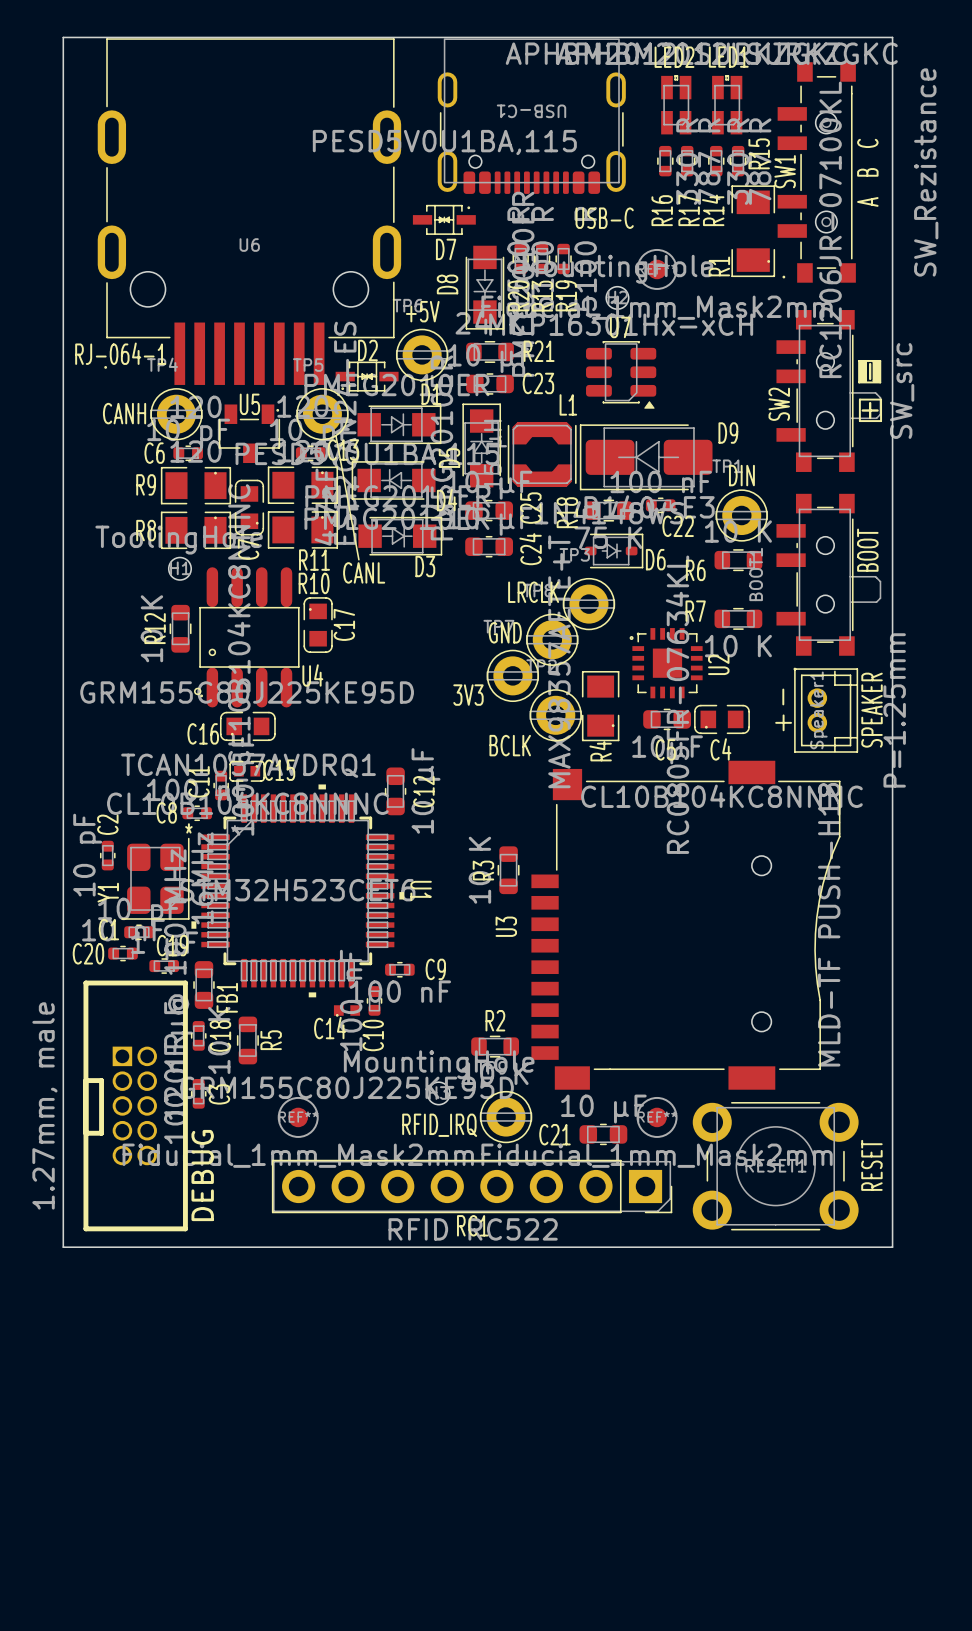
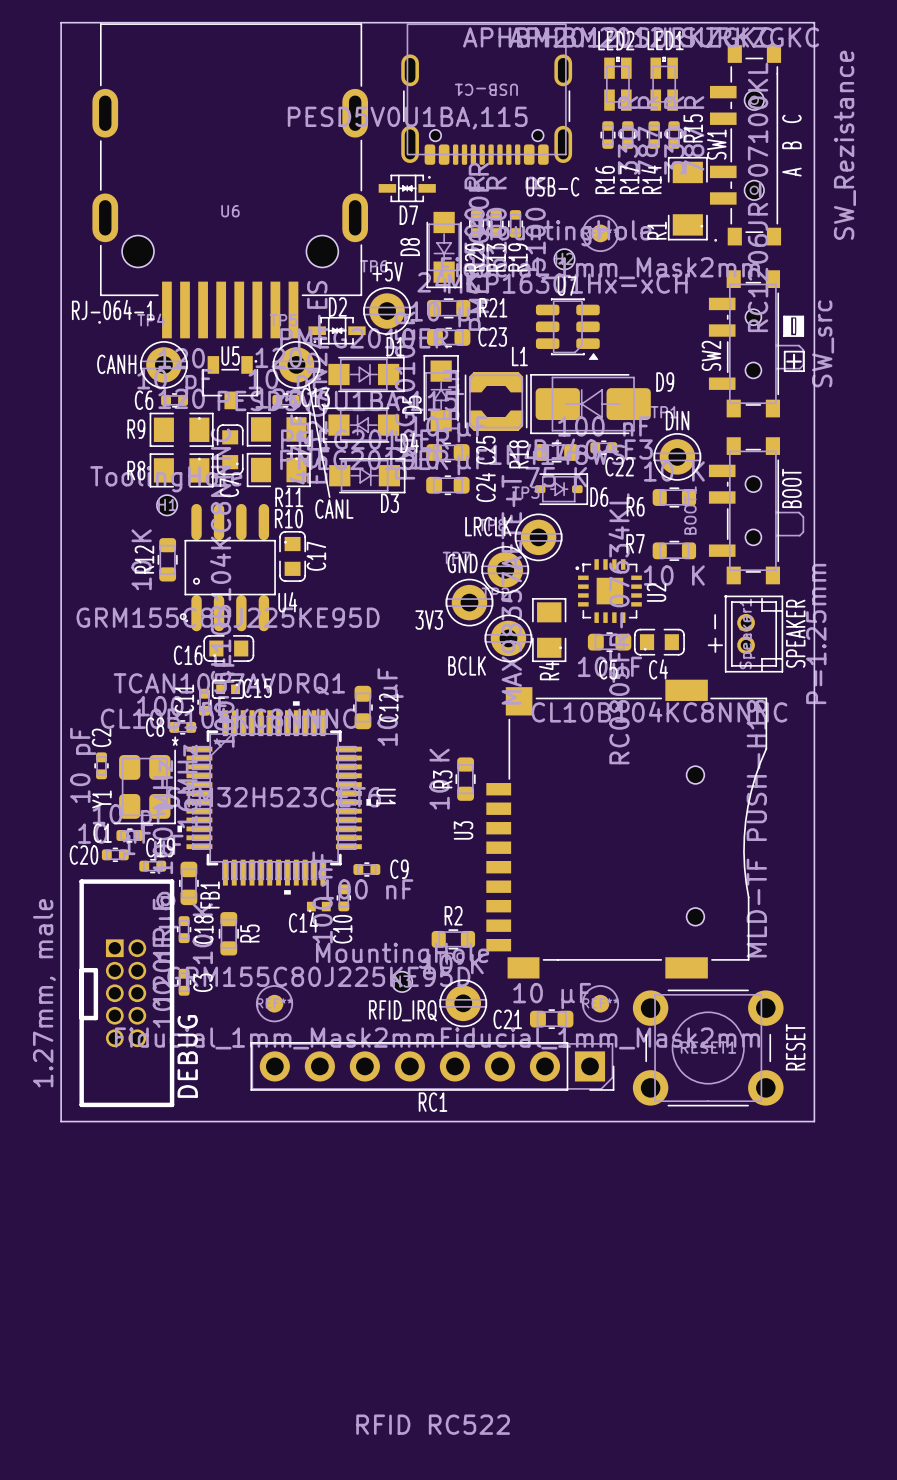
RC1 value position: RFID RC522 (473, 1229) -> RFID RC522 (433, 1424)

